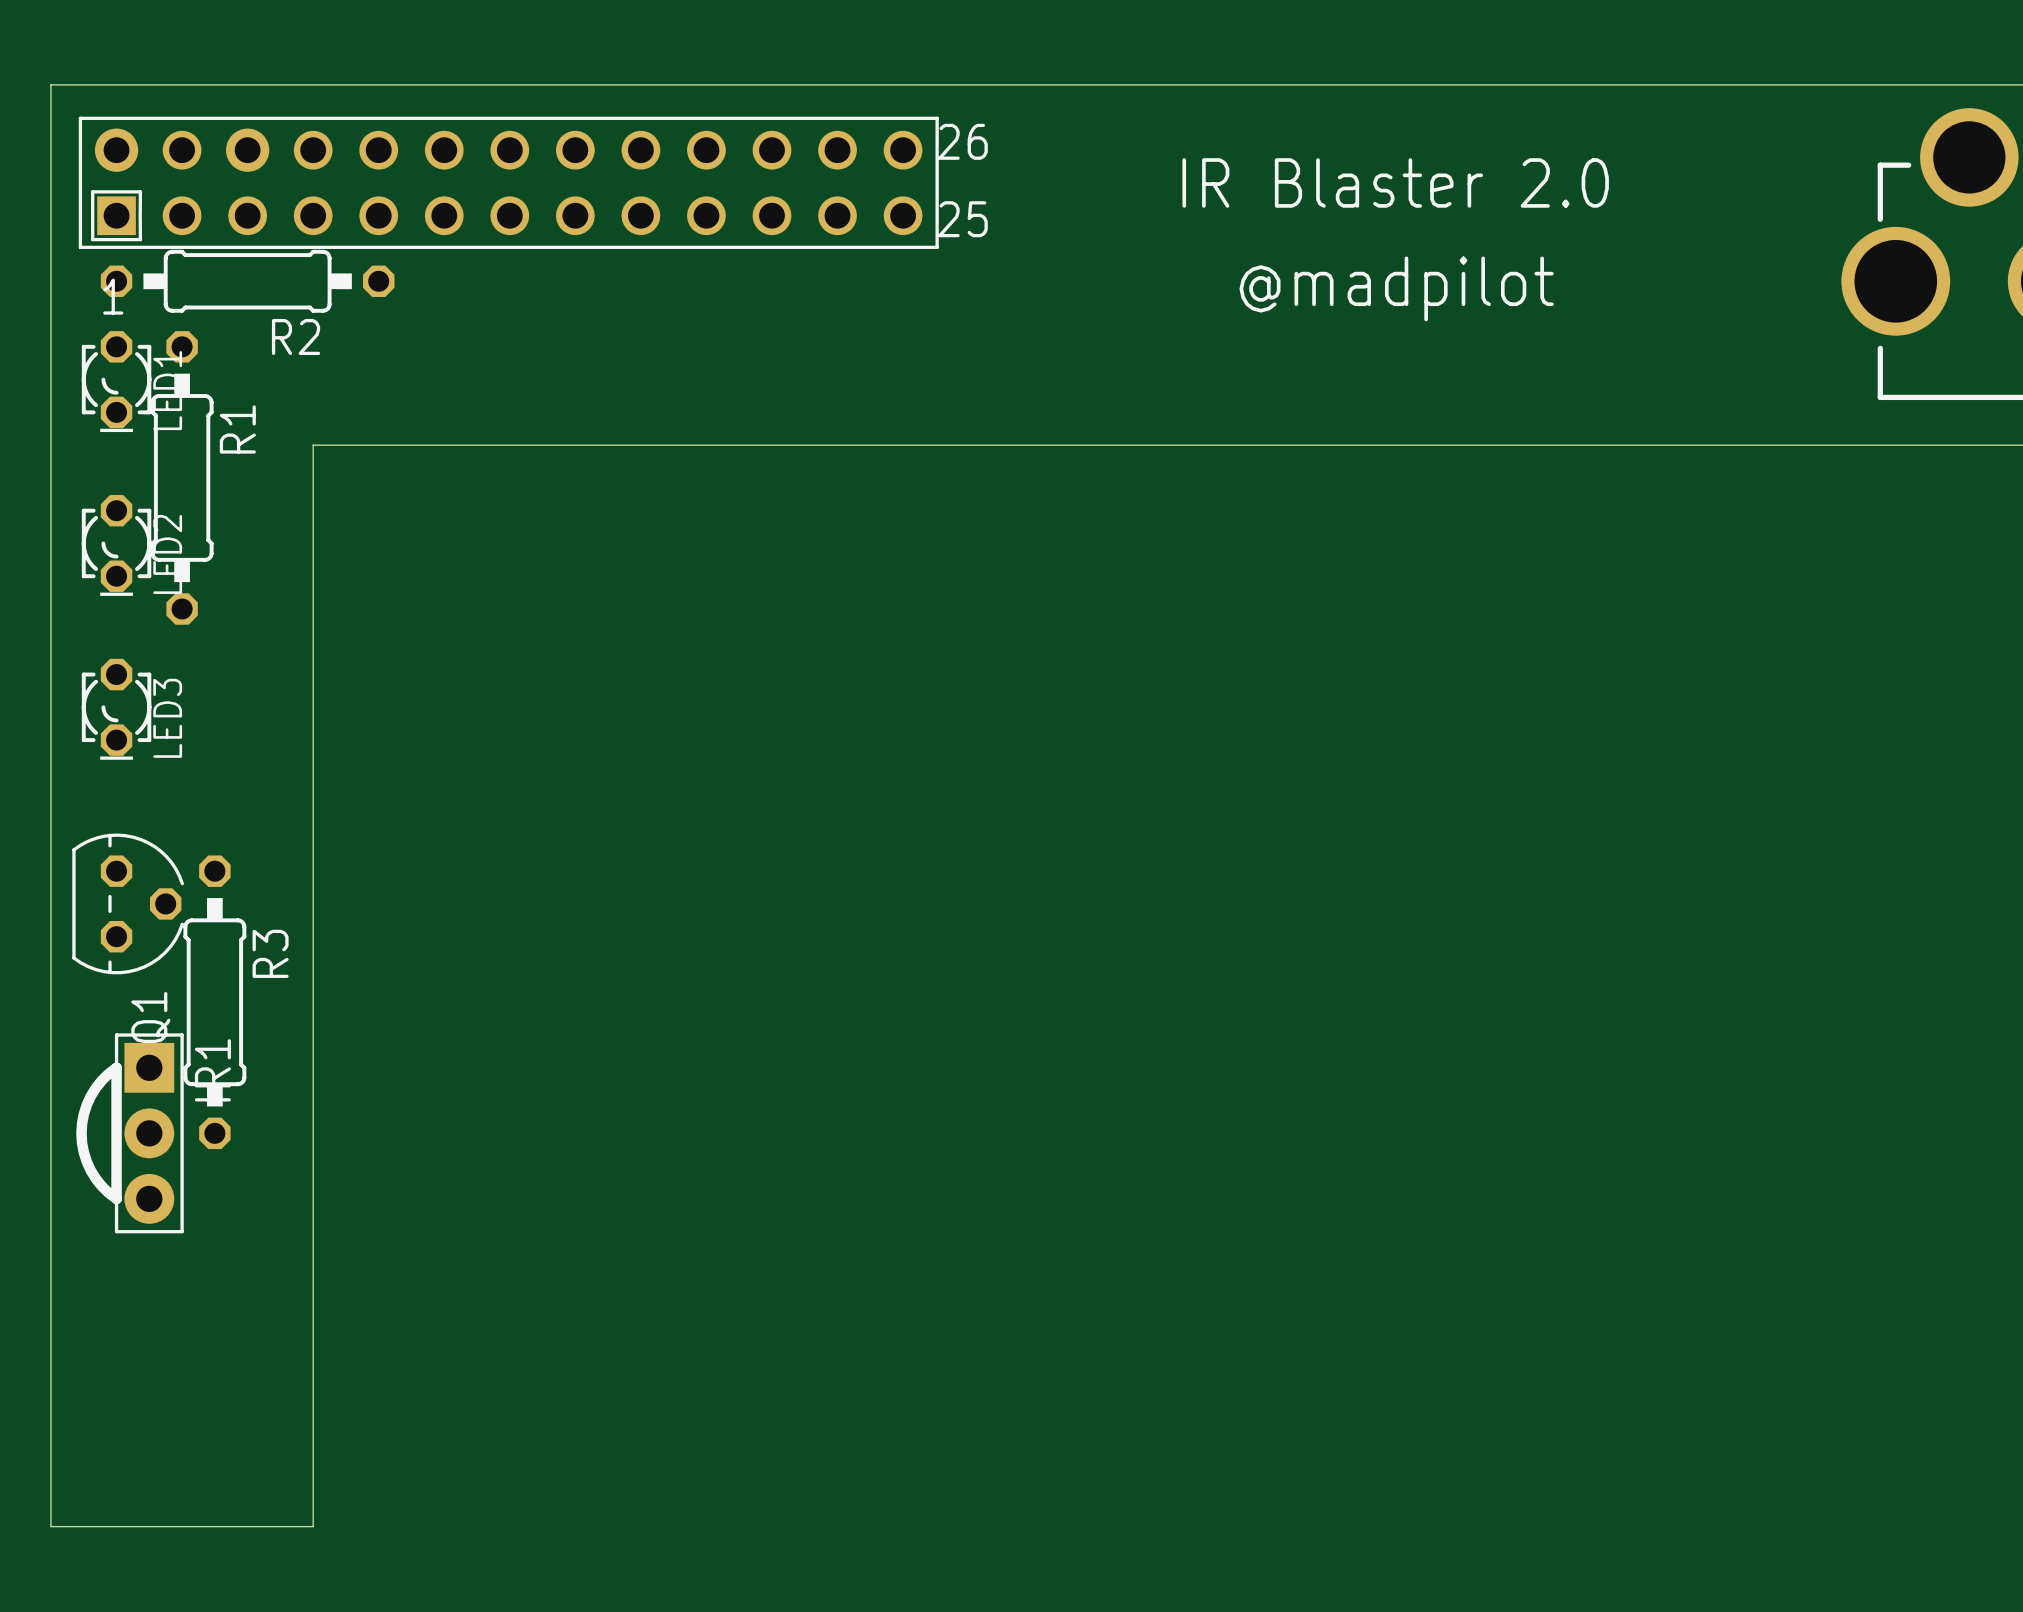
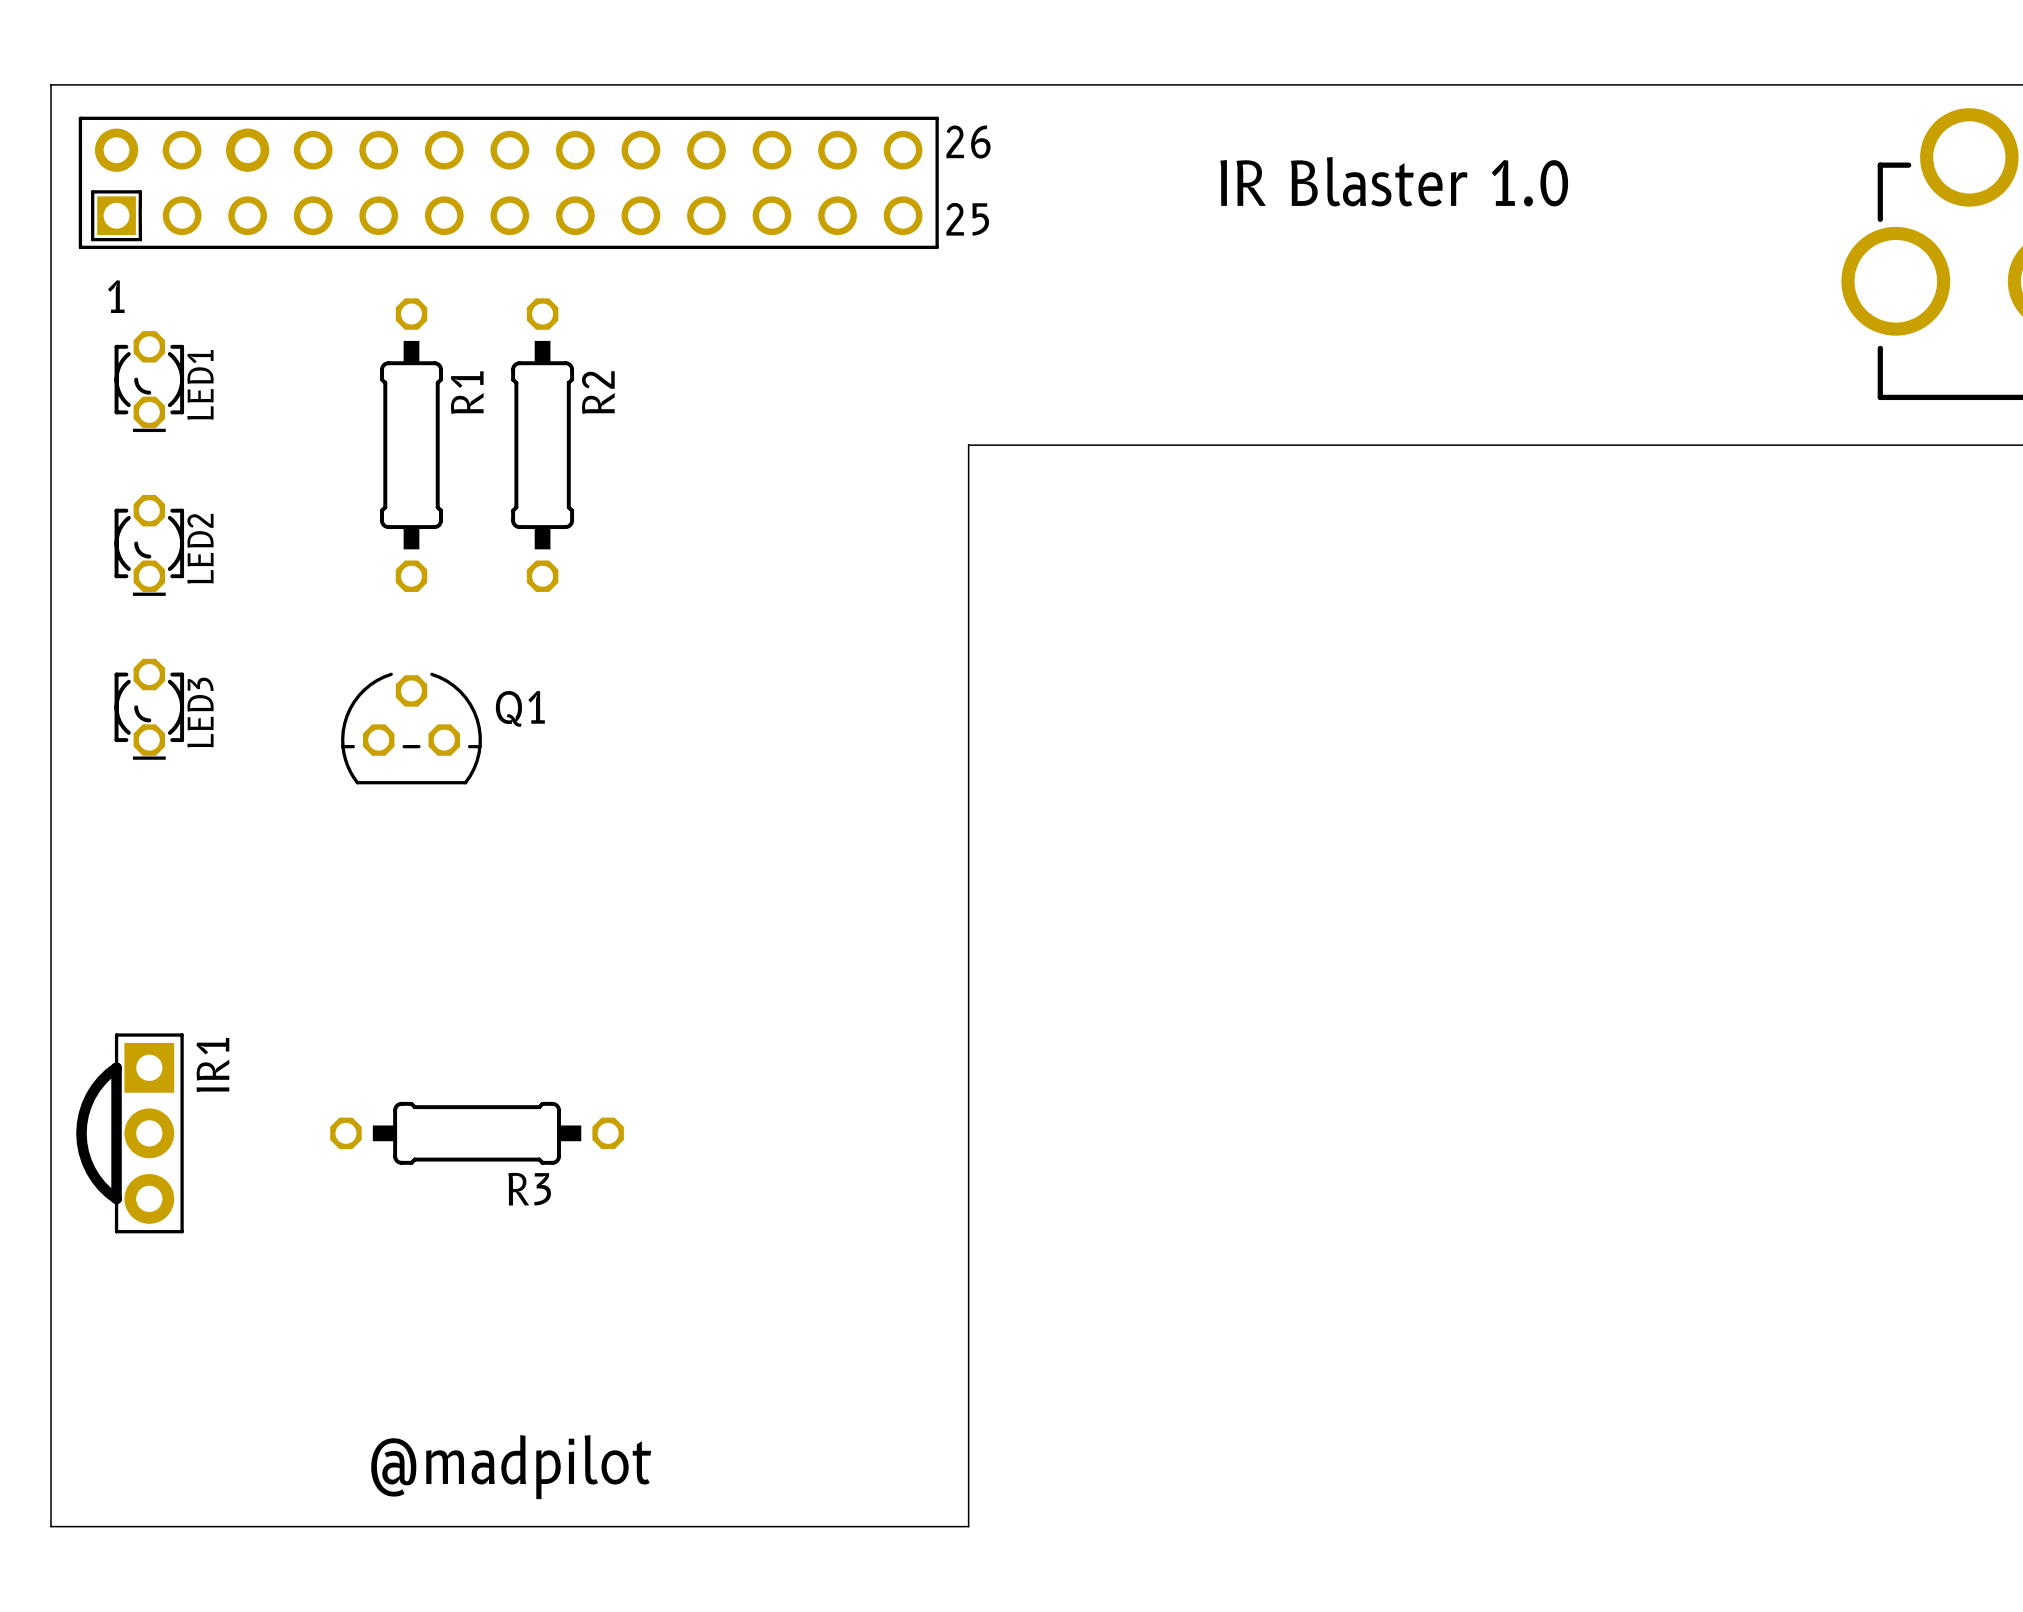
text: IR Blaster 2.0 (1395, 182) -> IR Blaster 1.0 (1394, 181)
R2 rotation: 0° (247, 281) -> 90° clockwise (542, 445)
R2 position: (247, 281) -> (542, 445)
text: @madpilot (1396, 288) -> none
R2 name position: R2 (296, 336) -> R2 (598, 392)
LED1 position: (116, 381) -> (149, 381)
board edge: (968, 445) (313, 445) (313, 1526) -> (968, 445) (968, 1526) (313, 1526)
R1 position: (182, 477) -> (411, 445)
LED2 position: (116, 545) -> (149, 545)
LED3 position: (116, 709) -> (149, 709)
Q1 rotation: 0° (128, 903) -> 90° counterclockwise (411, 728)
Q1 position: (128, 903) -> (411, 728)
R3 rotation: 0° (214, 1002) -> 90° clockwise (477, 1133)
R3 position: (214, 1002) -> (477, 1133)
text: none -> @madpilot (511, 1467)

